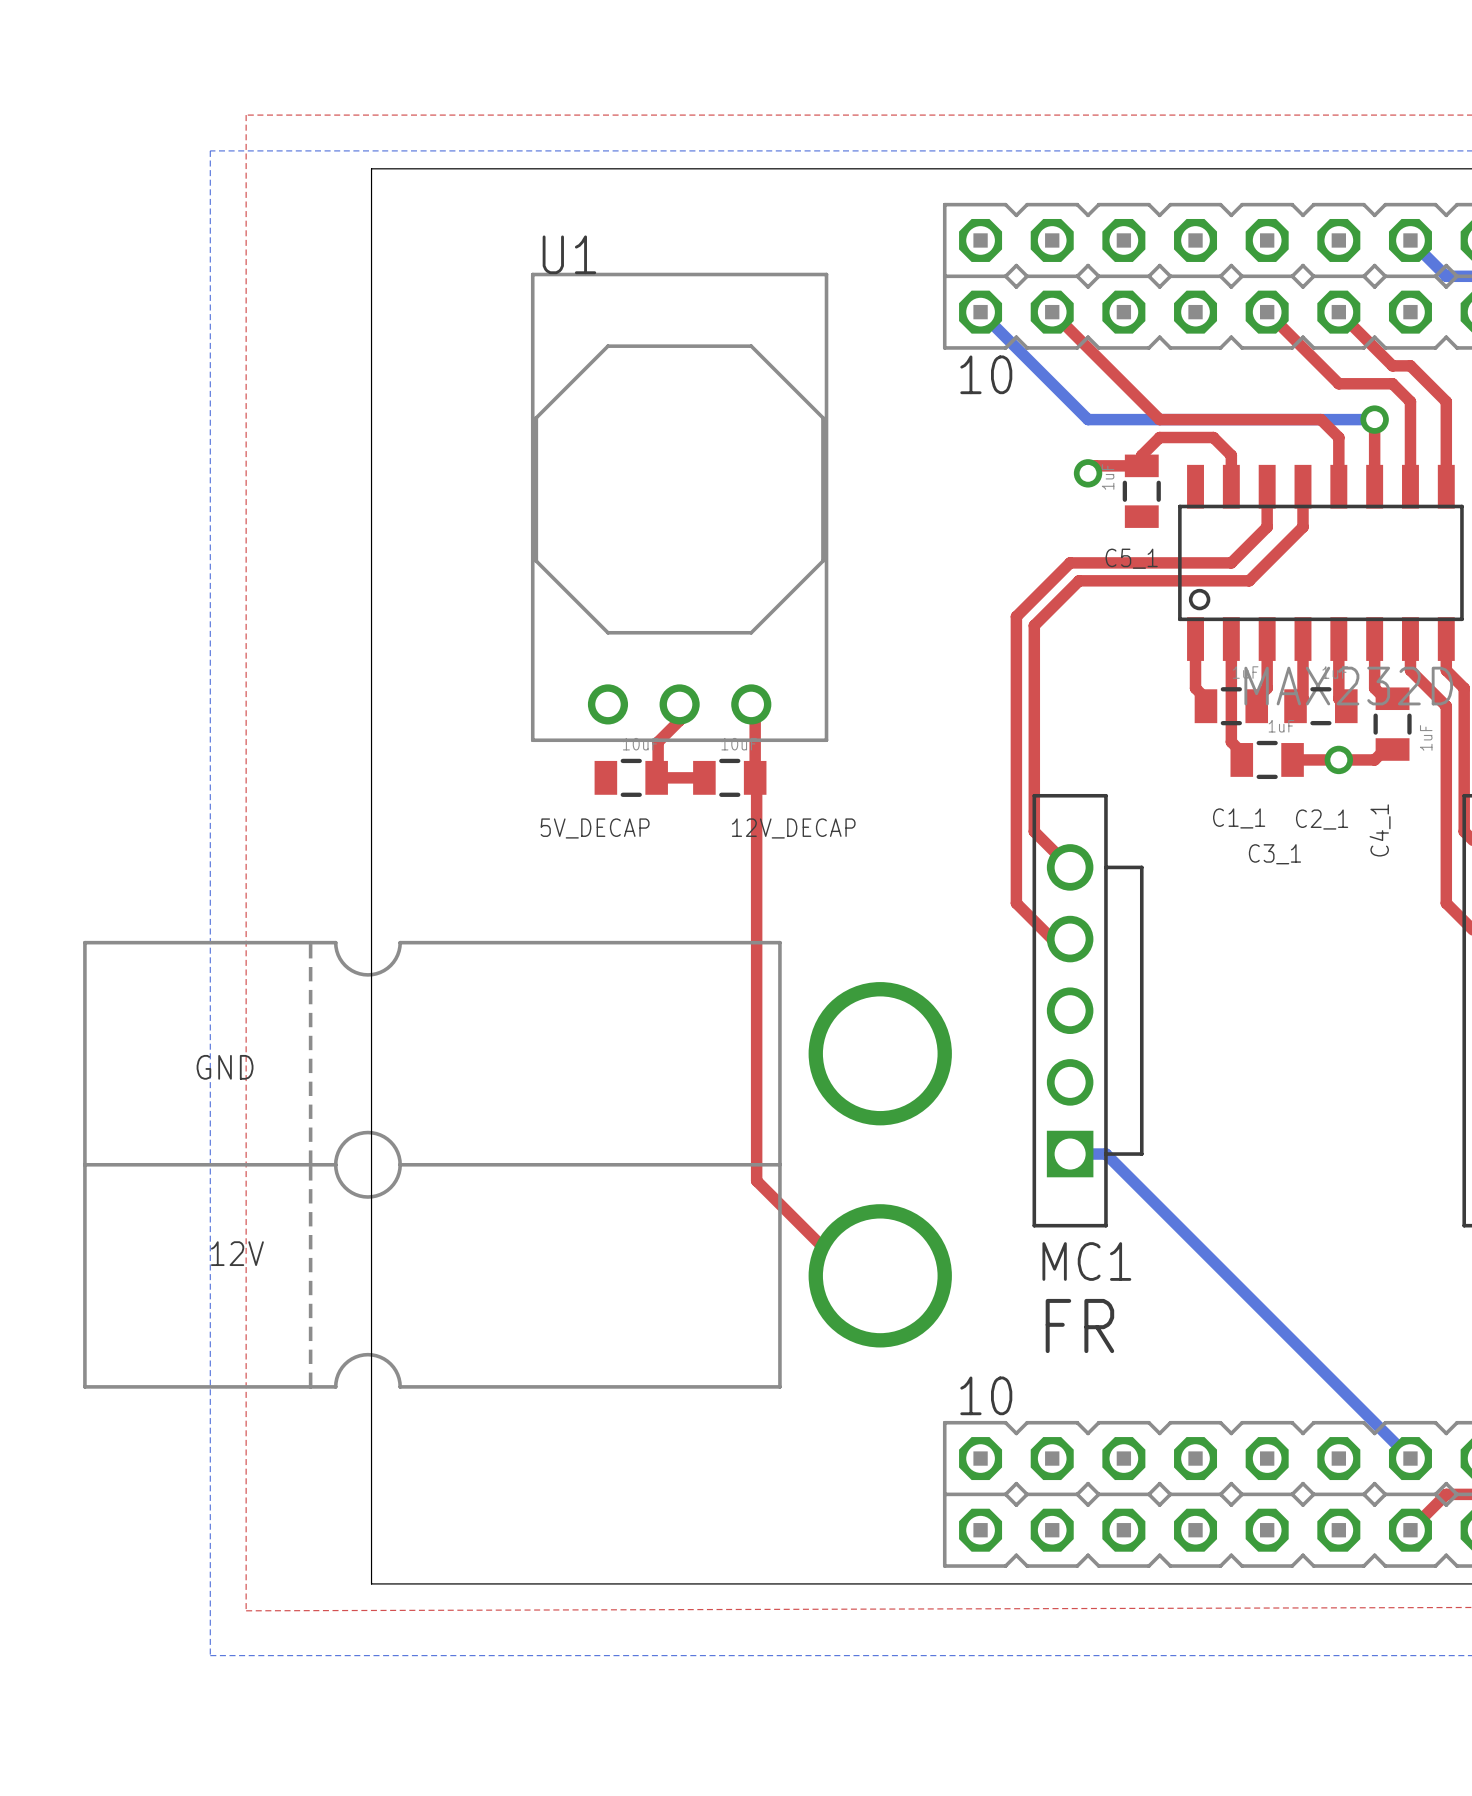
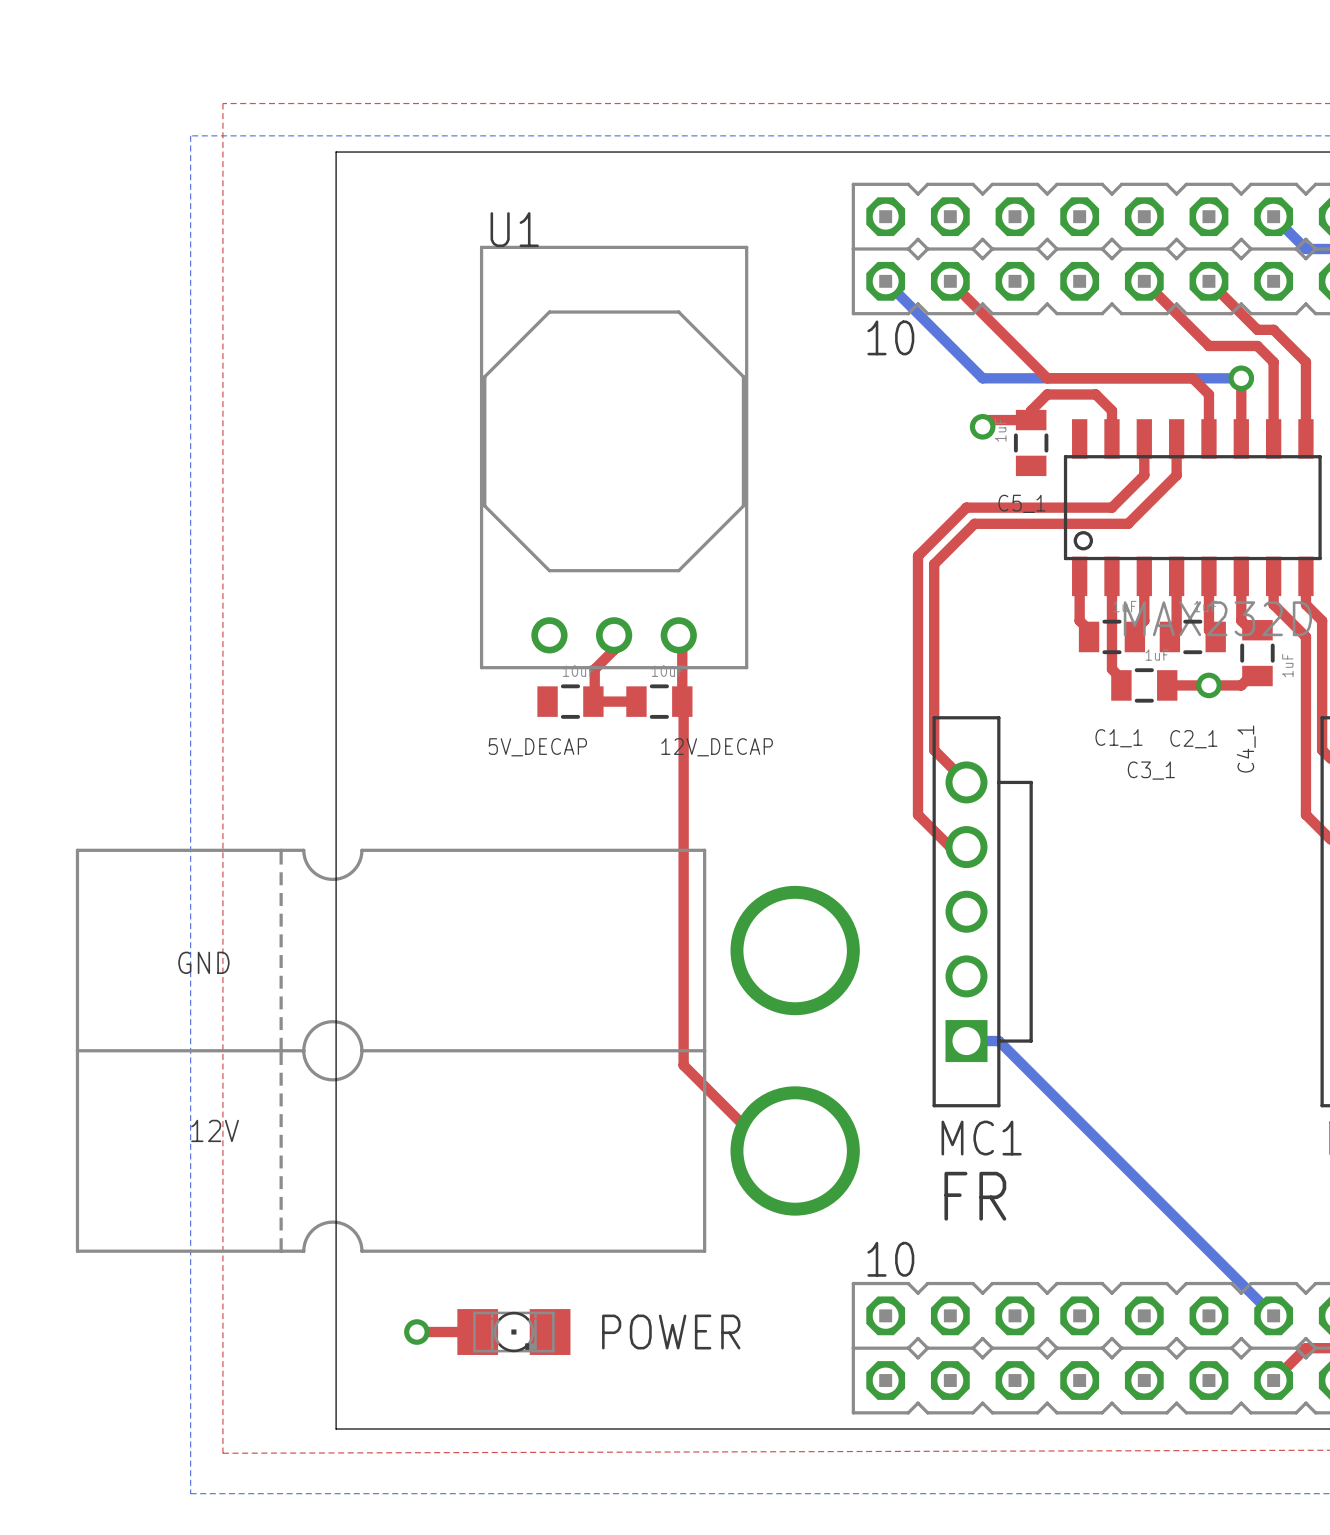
top track: none -> (416, 1332) (477, 1332)
via: none -> (416, 1332)
POWER: none -> (513, 1332)

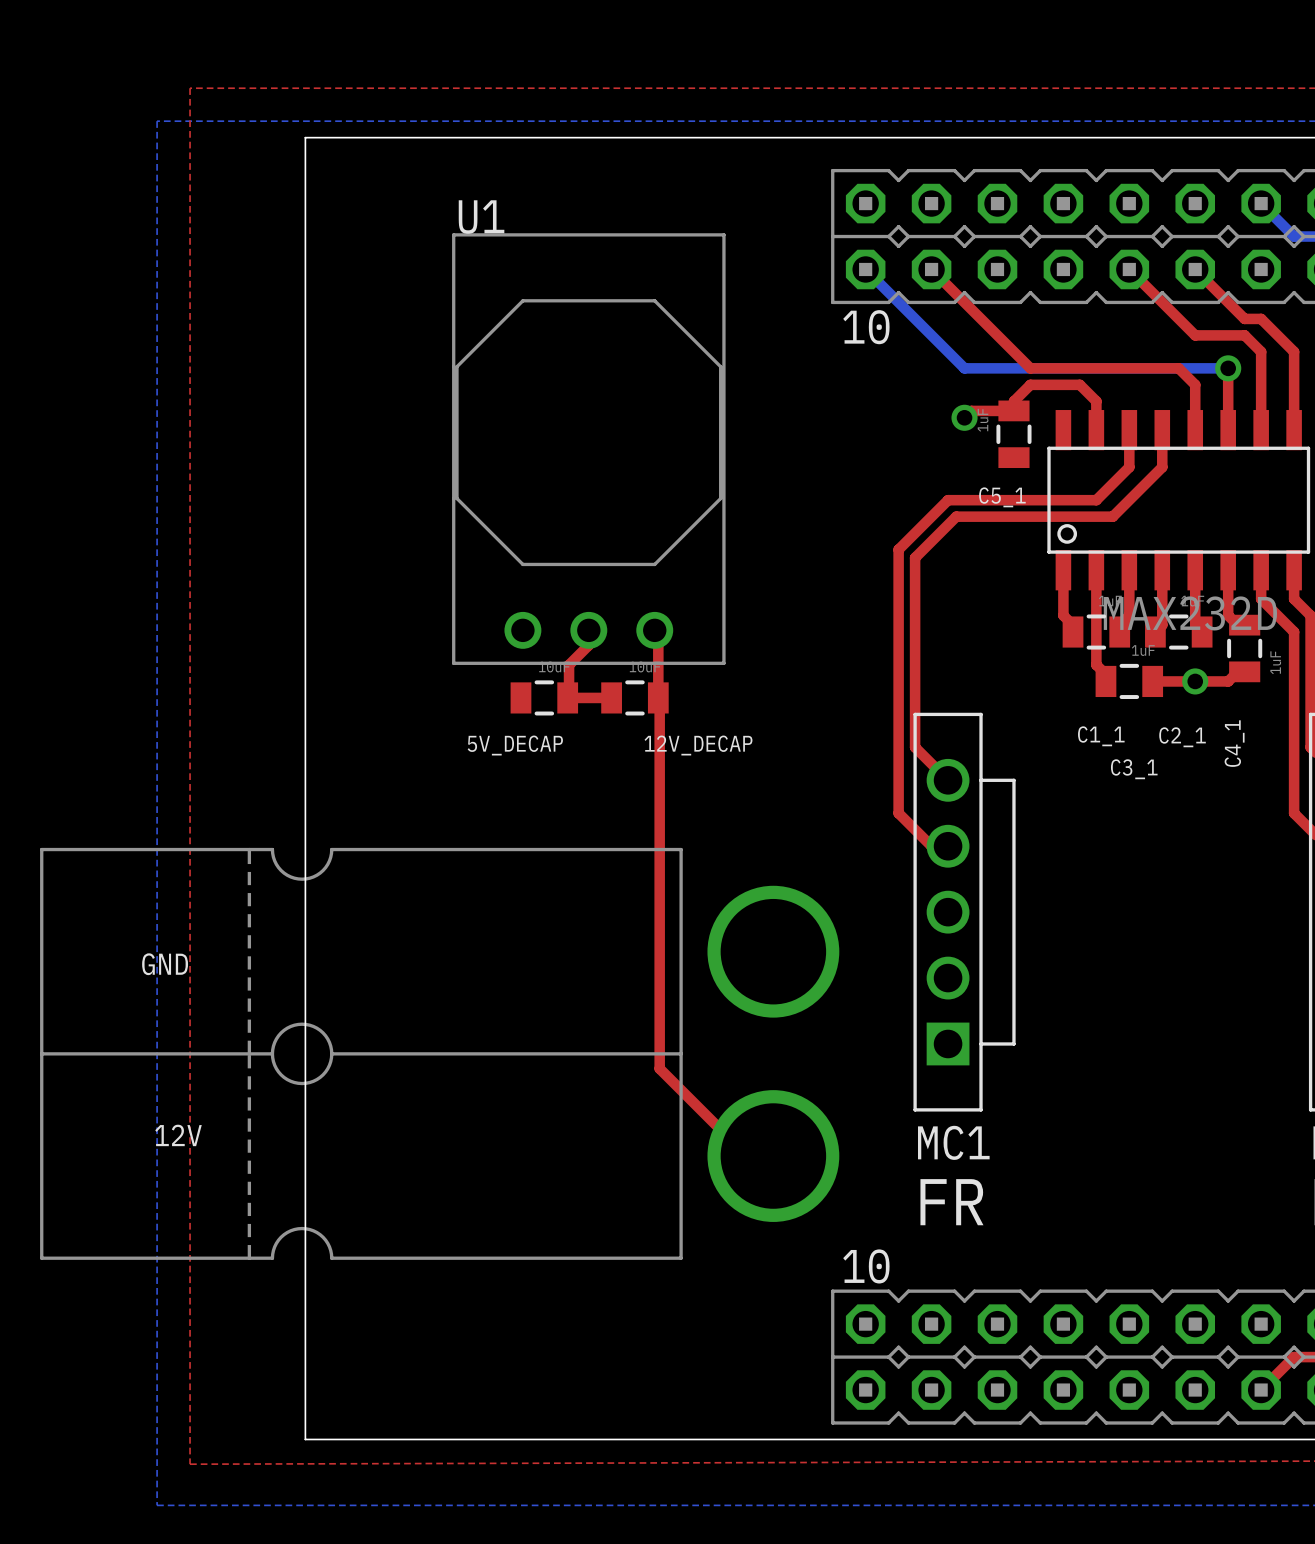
bottom track: (966, 1041) (998, 1041) (1273, 1315) -> none
top track: (416, 1332) (477, 1332) -> none
via: (416, 1332) -> none
POWER: (513, 1332) -> none

